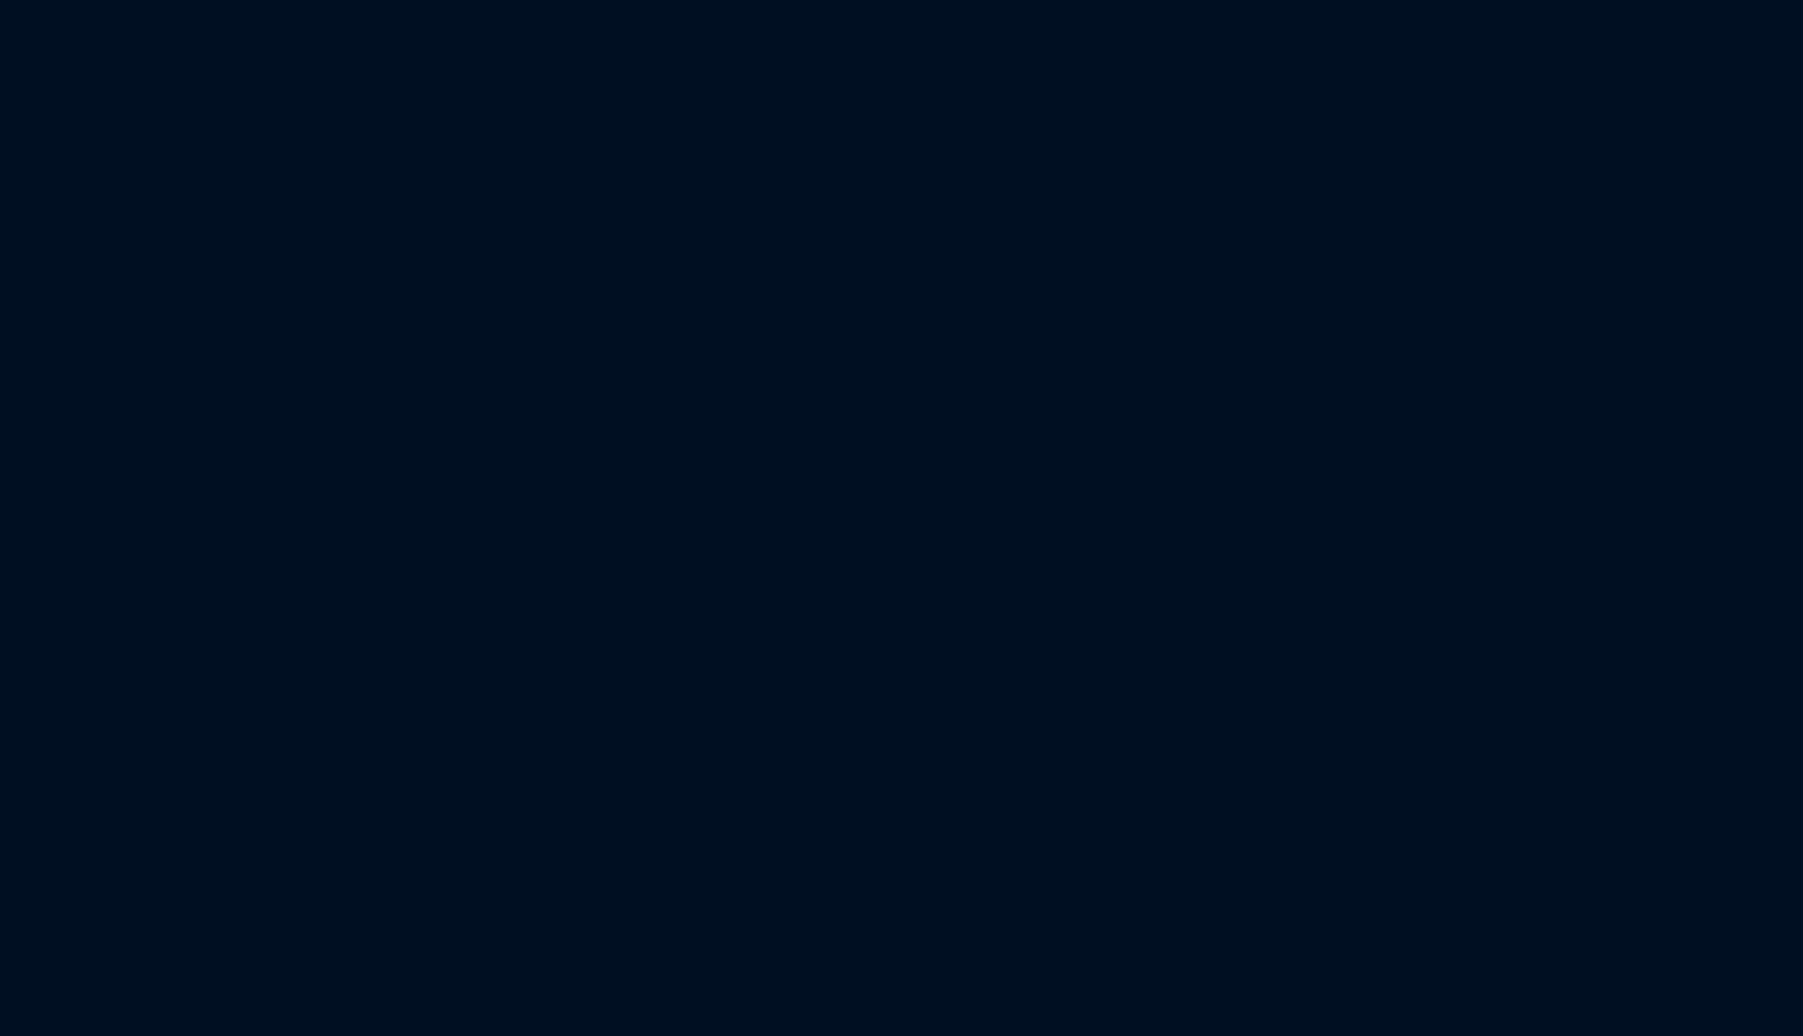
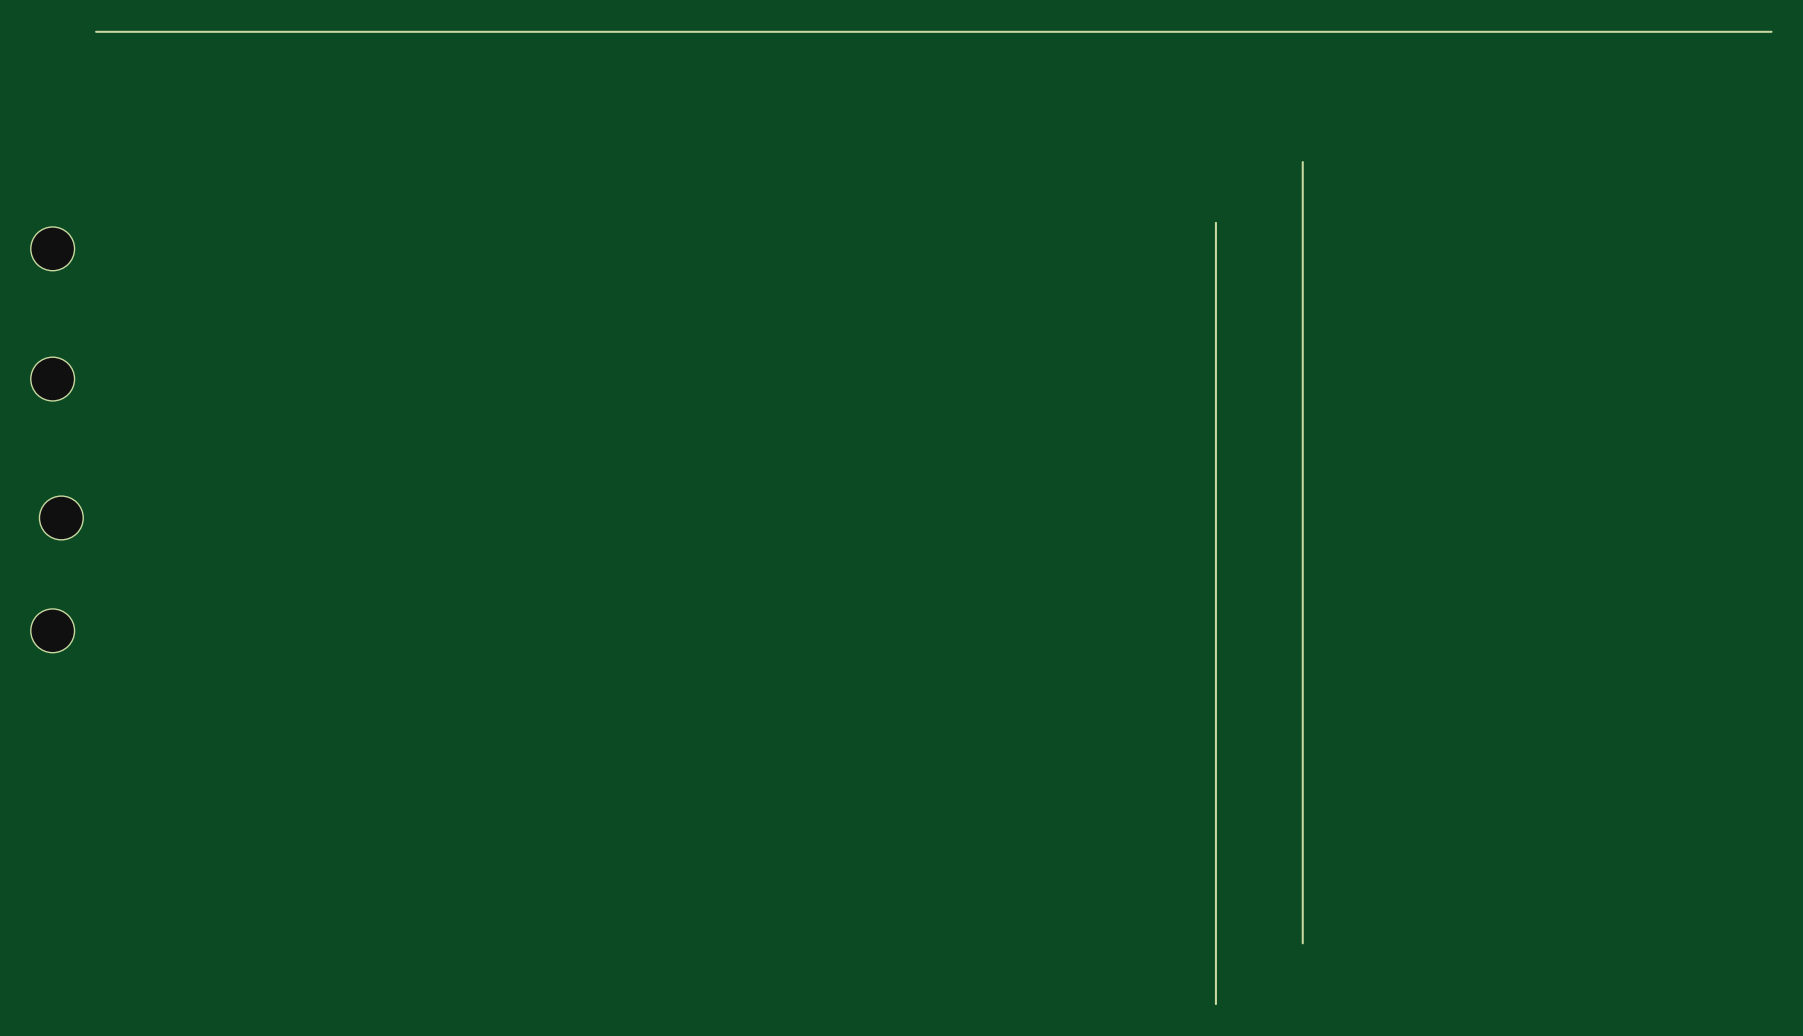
board edge: none -> (1771, 31) (96, 31)
board edge: none -> (1302, 162) (1302, 943)
board edge: none -> (1215, 222) (1215, 1004)
part: none -> (52, 248)
part: none -> (52, 379)
part: none -> (61, 517)
part: none -> (52, 630)

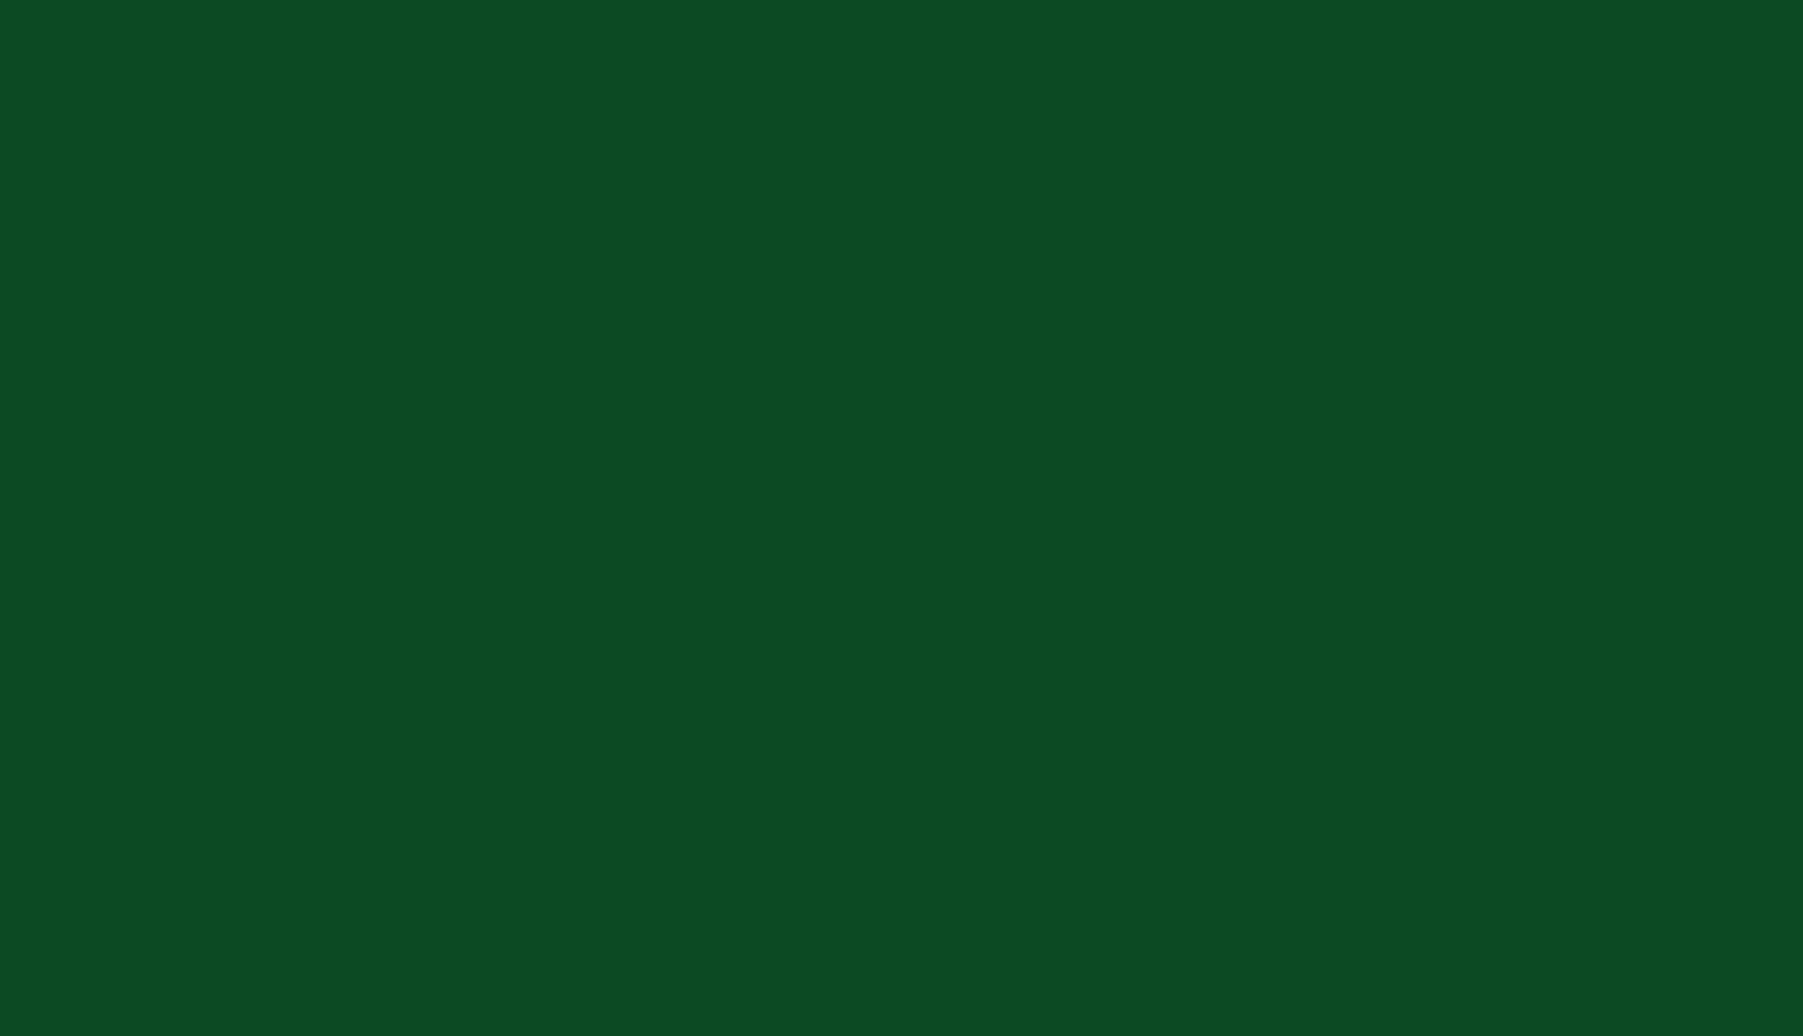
board edge: (1771, 31) (96, 31) -> none
board edge: (1302, 162) (1302, 943) -> none
board edge: (1215, 222) (1215, 1004) -> none
part: (52, 248) -> none
part: (52, 379) -> none
part: (61, 517) -> none
part: (52, 630) -> none

